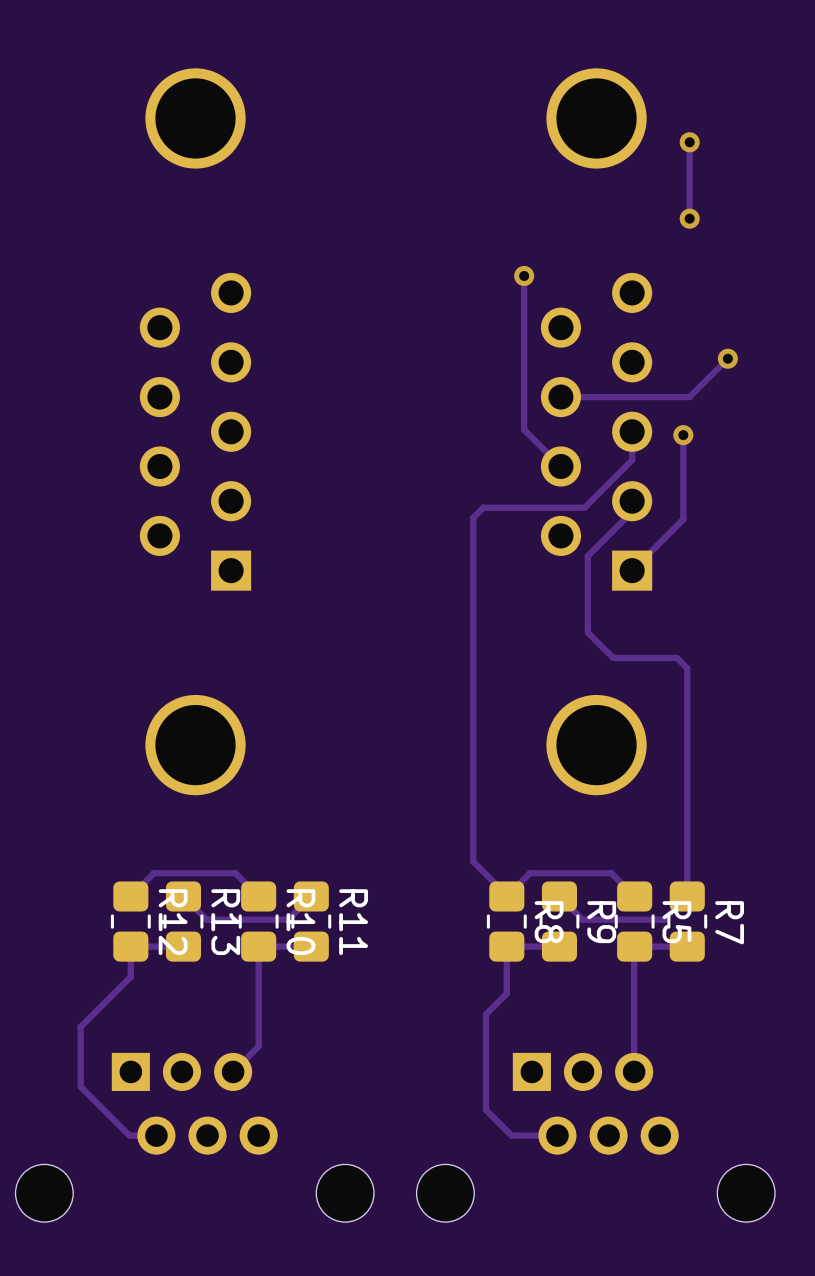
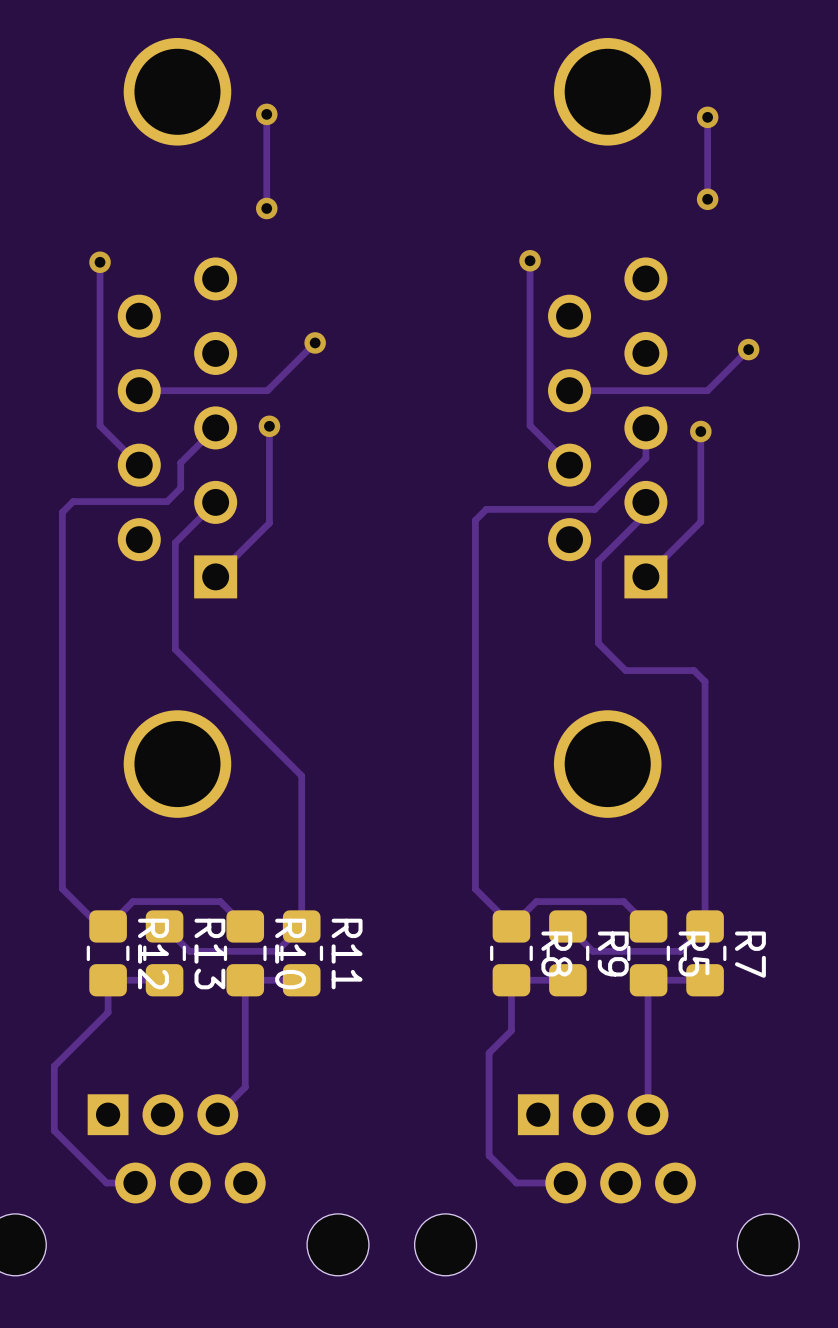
track: none -> (266, 114) (266, 208)
via: none -> (266, 114)
via: none -> (266, 208)
track: none -> (100, 262) (100, 425) (139, 465)
via: none -> (100, 262)
track: none -> (315, 342) (267, 390) (139, 390)
via: none -> (315, 342)
track: none -> (269, 426) (269, 523) (215, 576)
via: none -> (269, 426)
track: none -> (215, 427) (180, 462) (180, 488) (167, 501) (73, 501) (62, 512) (62, 888) (100, 926) (108, 926)
track: none -> (215, 502) (175, 542) (175, 649) (301, 775) (301, 926)

